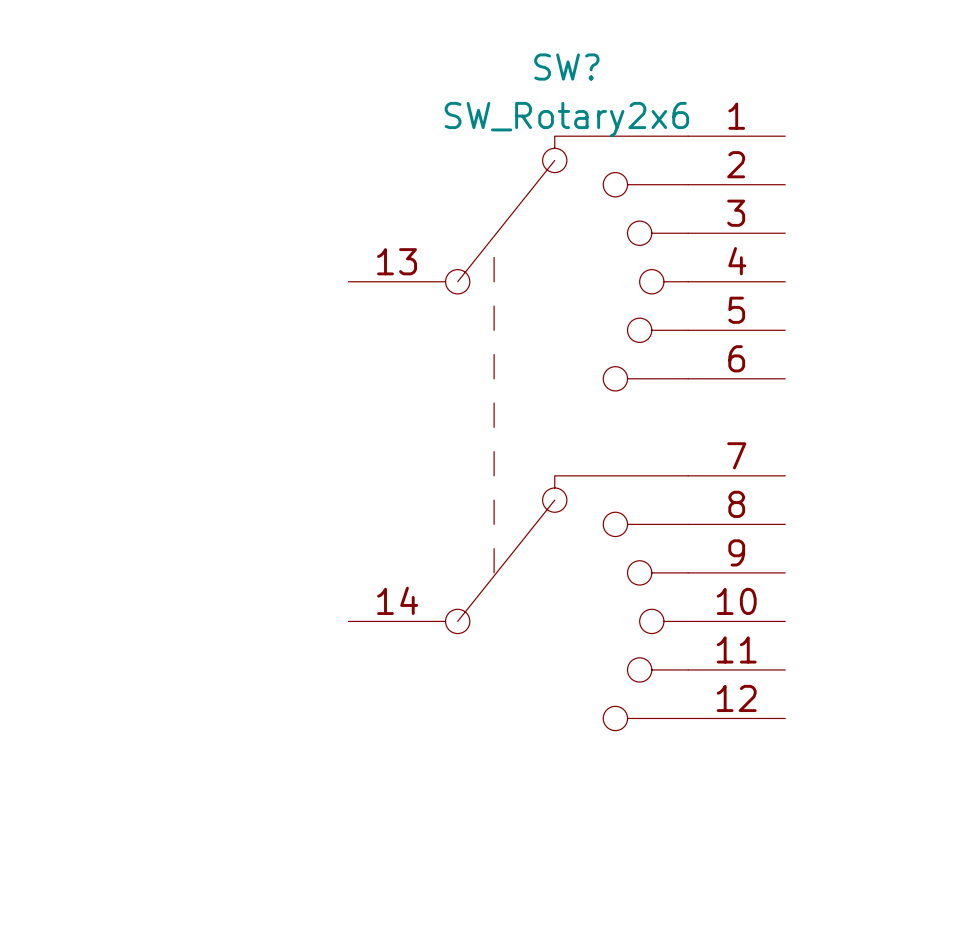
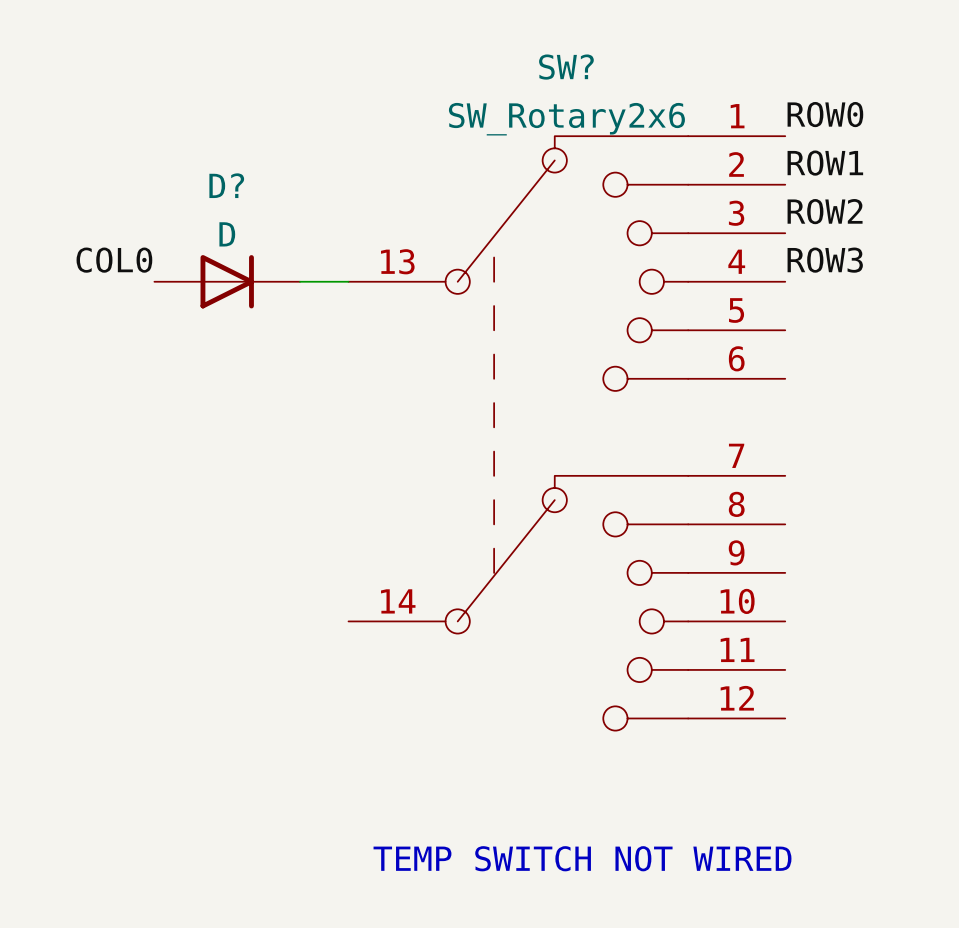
label: none -> ROW0 (825, 114)
label: none -> ROW1 (825, 163)
label: none -> ROW2 (825, 211)
label: none -> COL0 (114, 260)
label: none -> ROW3 (825, 260)
D?: none -> D (227, 281)
wire: none -> (300, 281) (348, 281)
text: none -> TEMP SWITCH NOT WIRED (582, 858)

